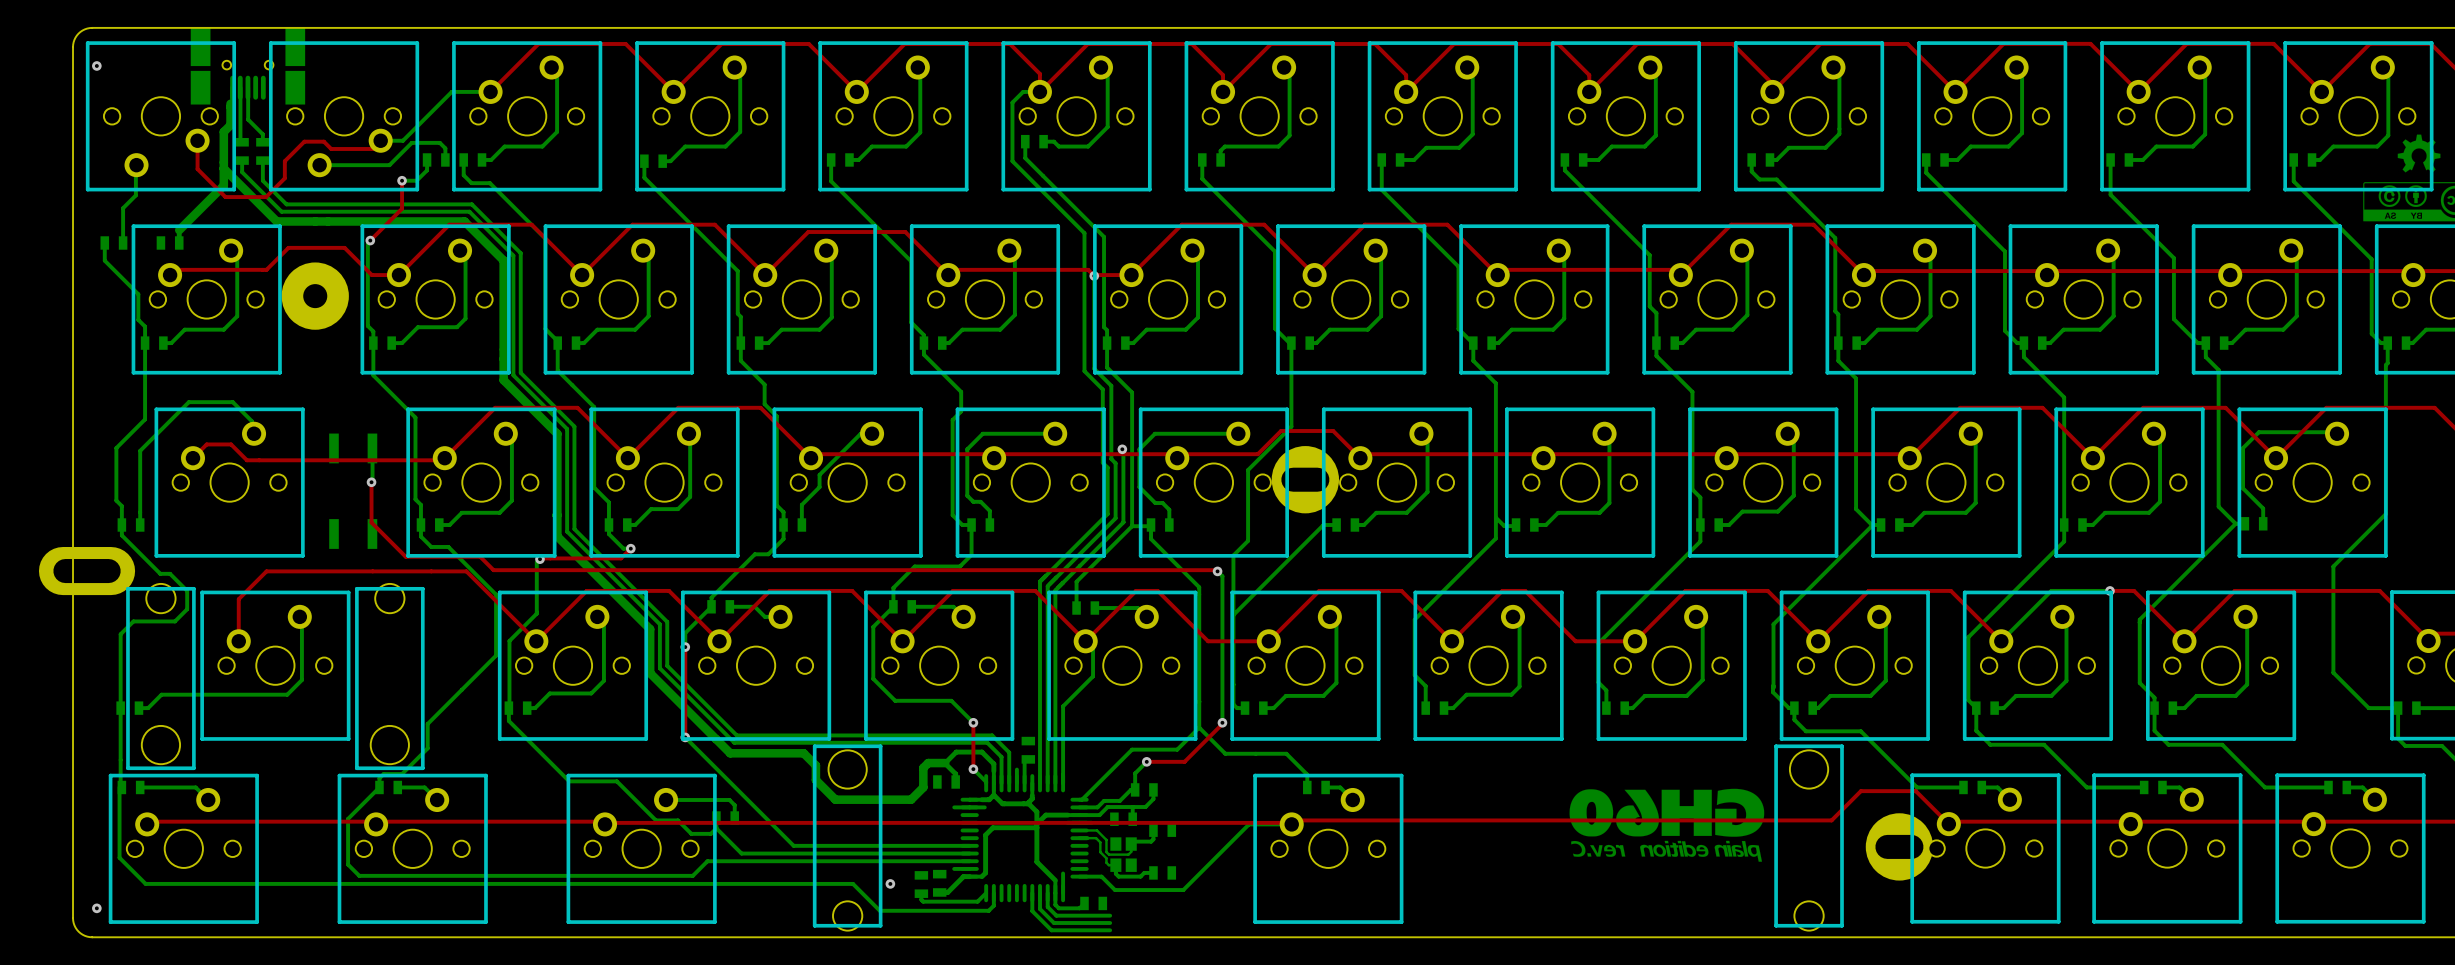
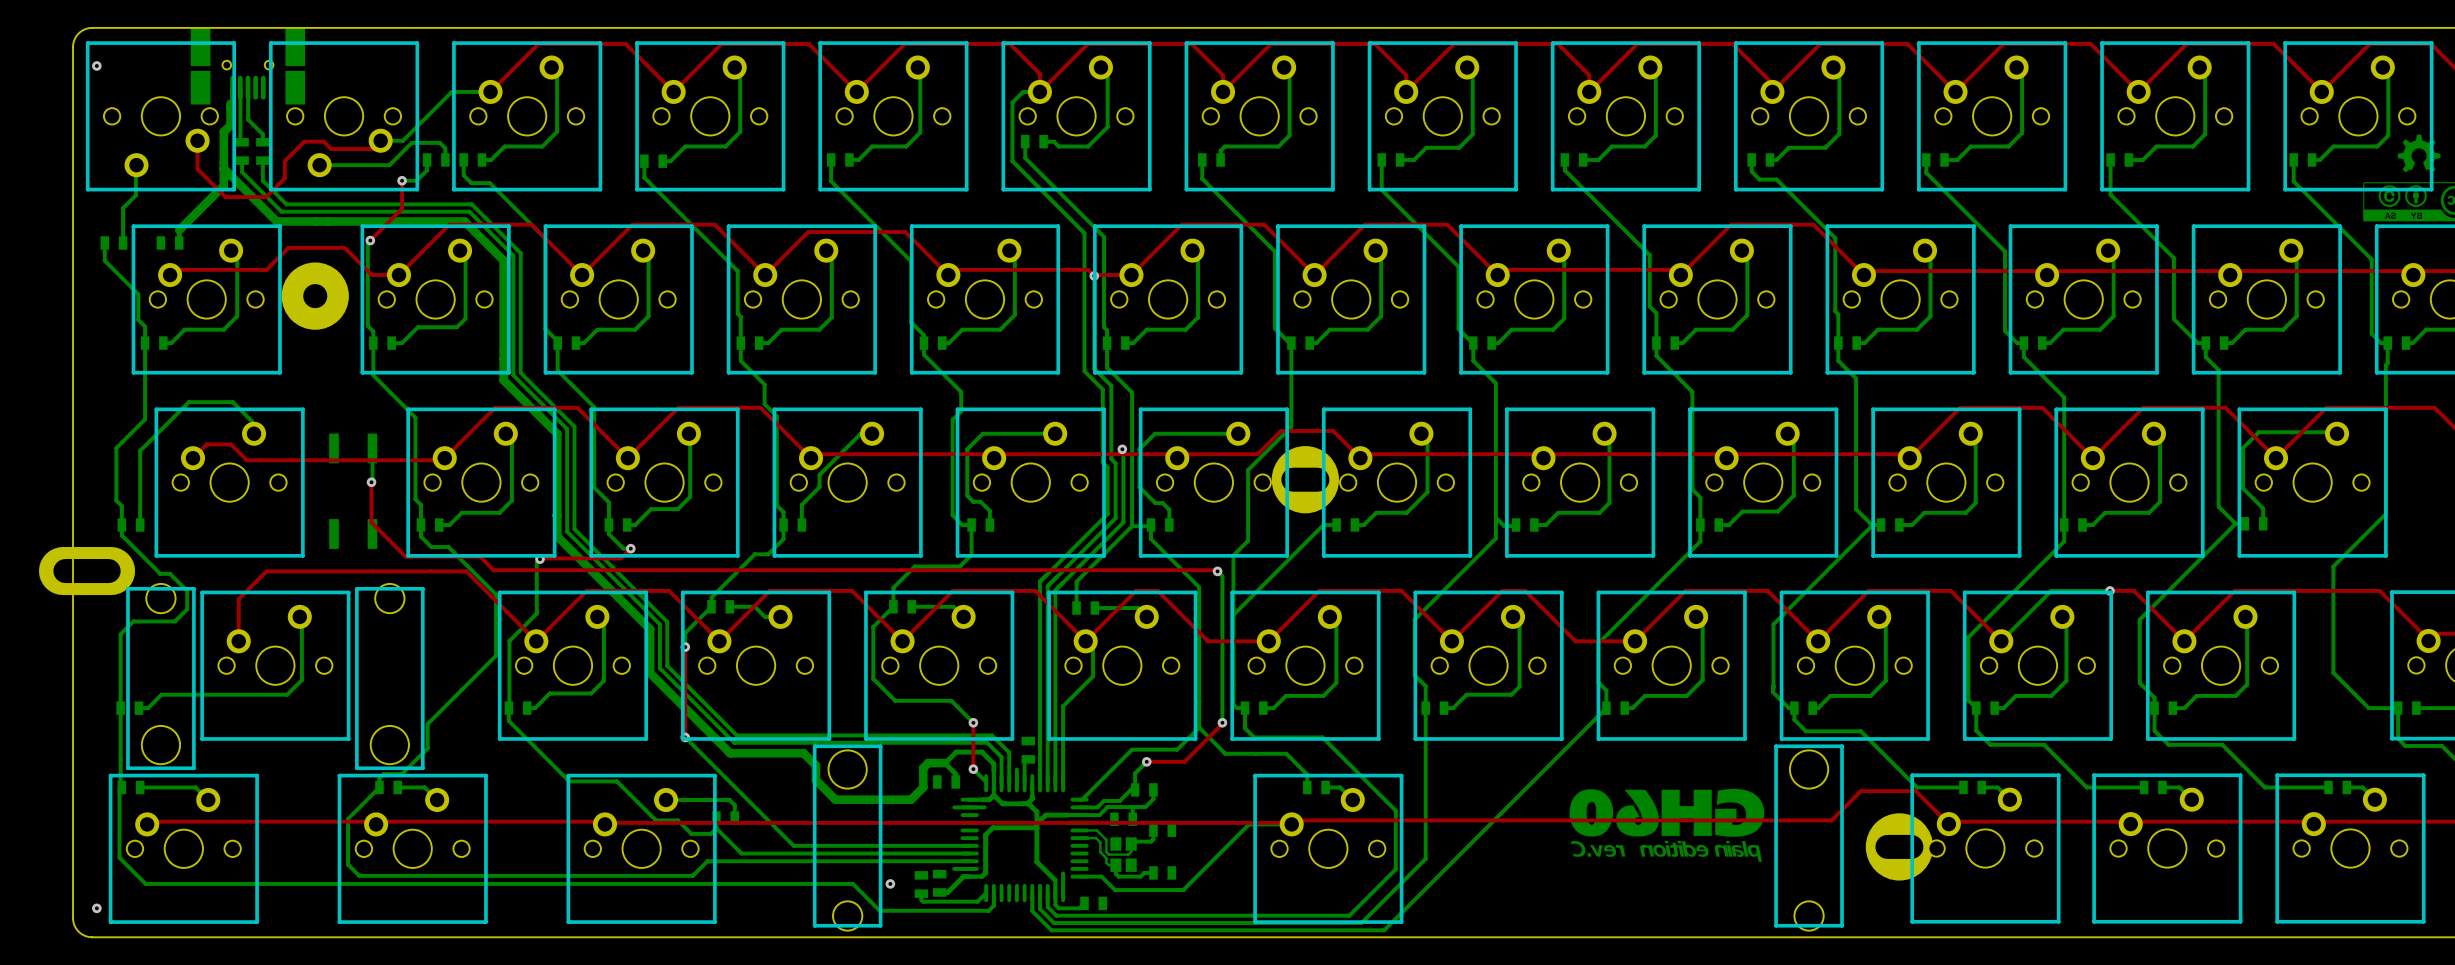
bottom track: none -> (1245, 708) (1245, 728) (1254, 737) (1322, 737) (1395, 810) (1395, 869) (1349, 915) (1110, 915)
bottom track: none -> (1425, 708) (1425, 858) (1361, 922) (1110, 922)
bottom track: none -> (1606, 708) (1384, 930) (1110, 930)

